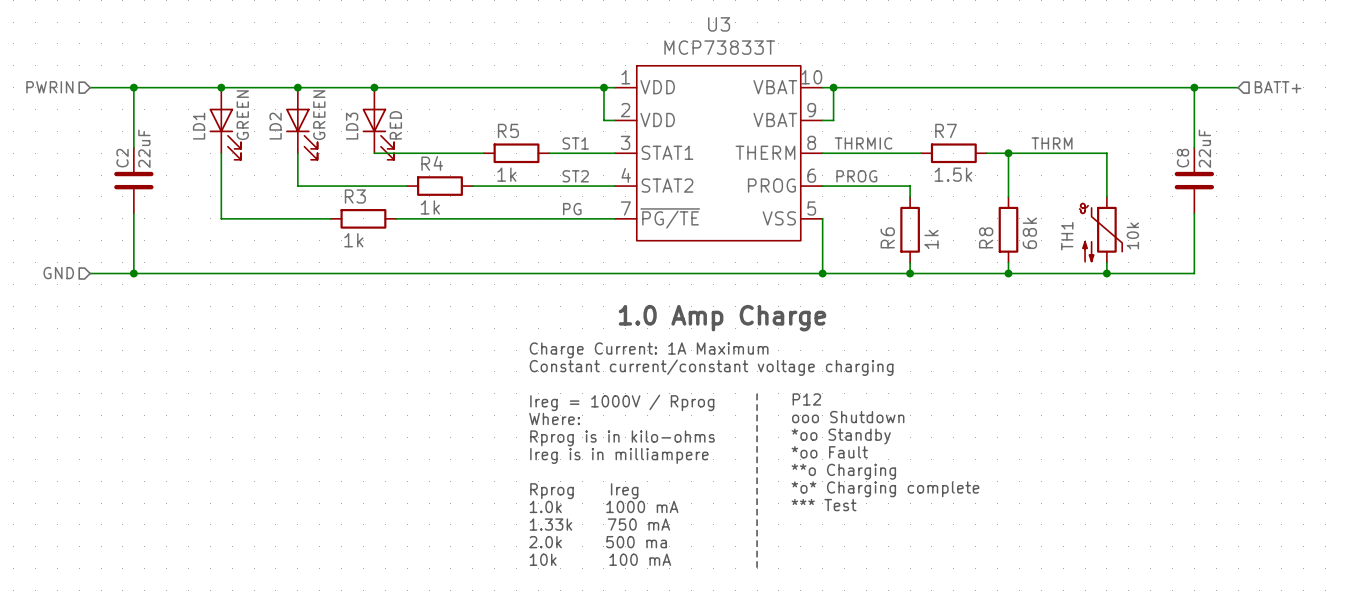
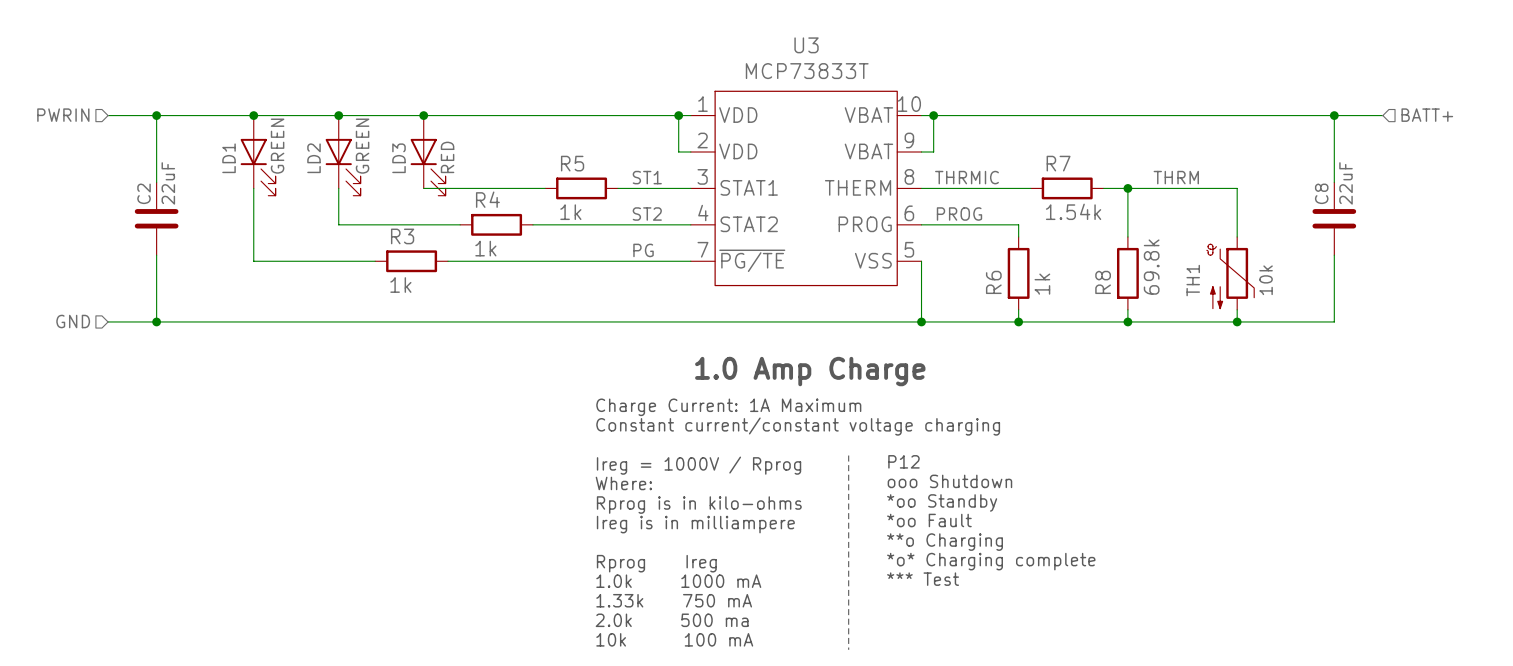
R7 value: 1.5k (953, 174) -> 1.54k (1073, 211)
R8 value: 68k (1029, 233) -> 69.8k (1151, 267)

